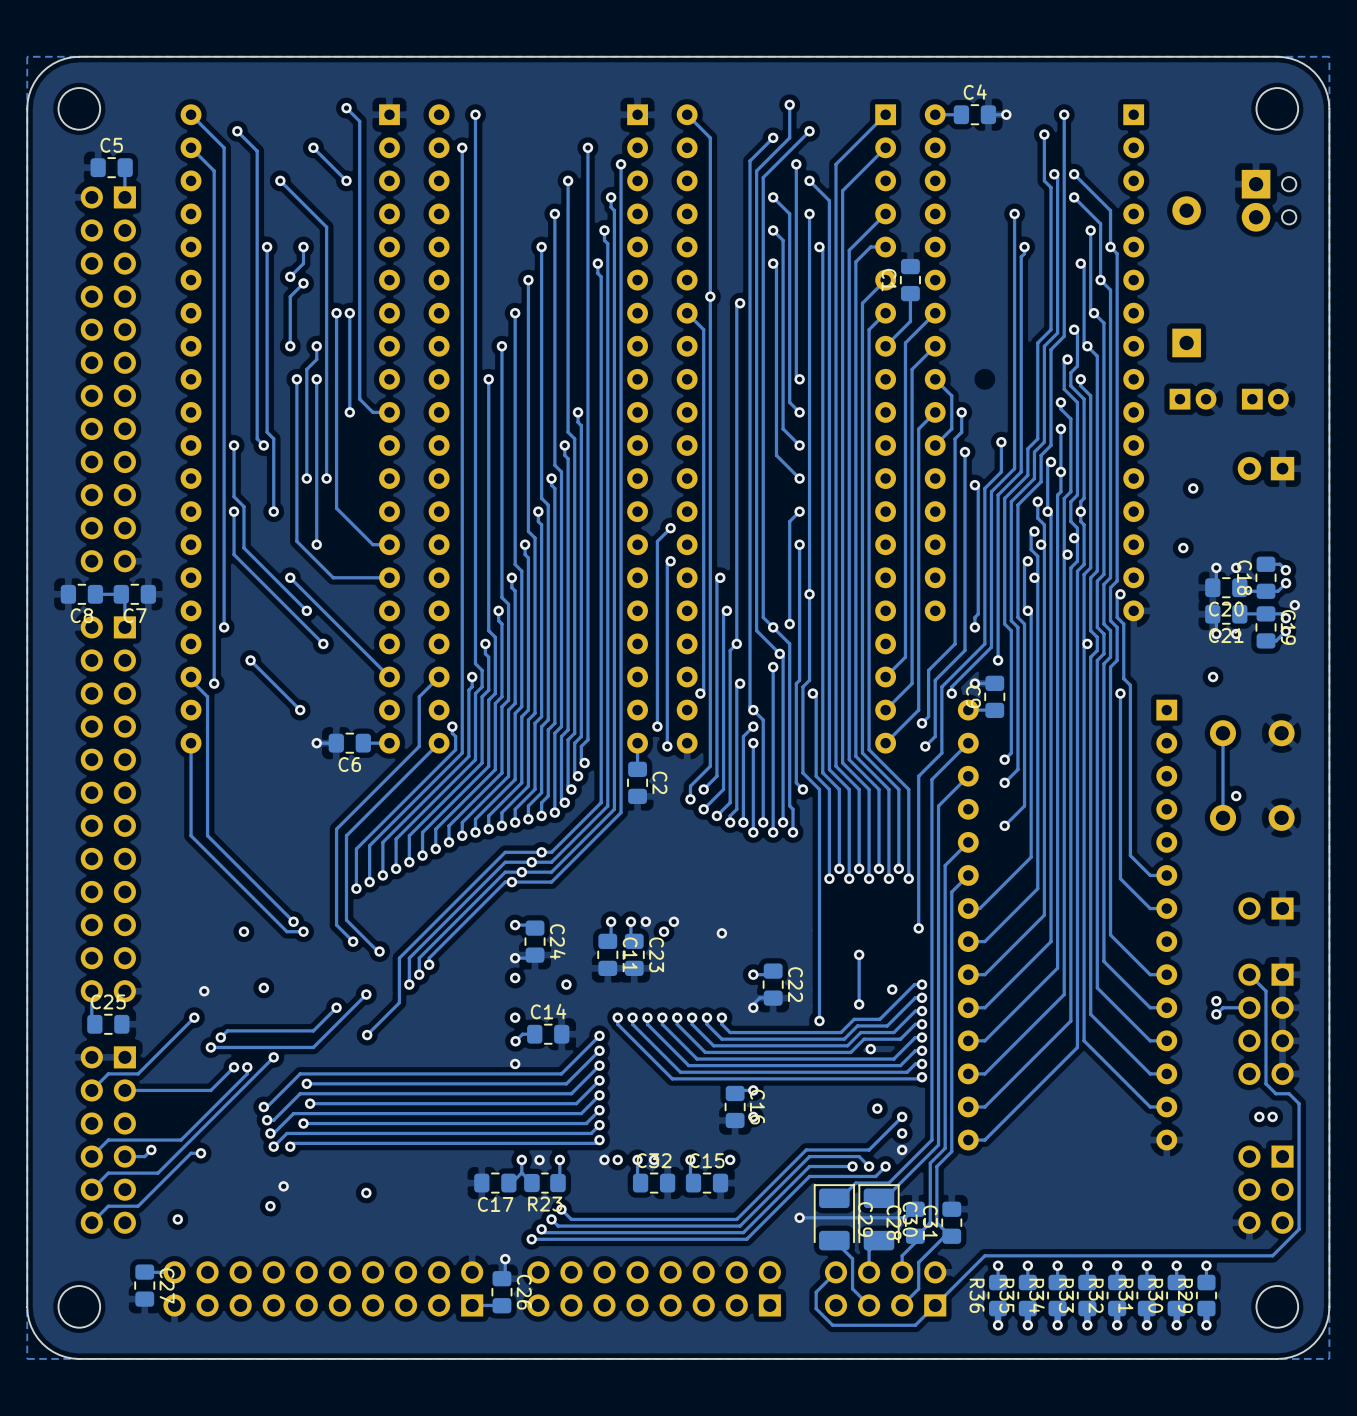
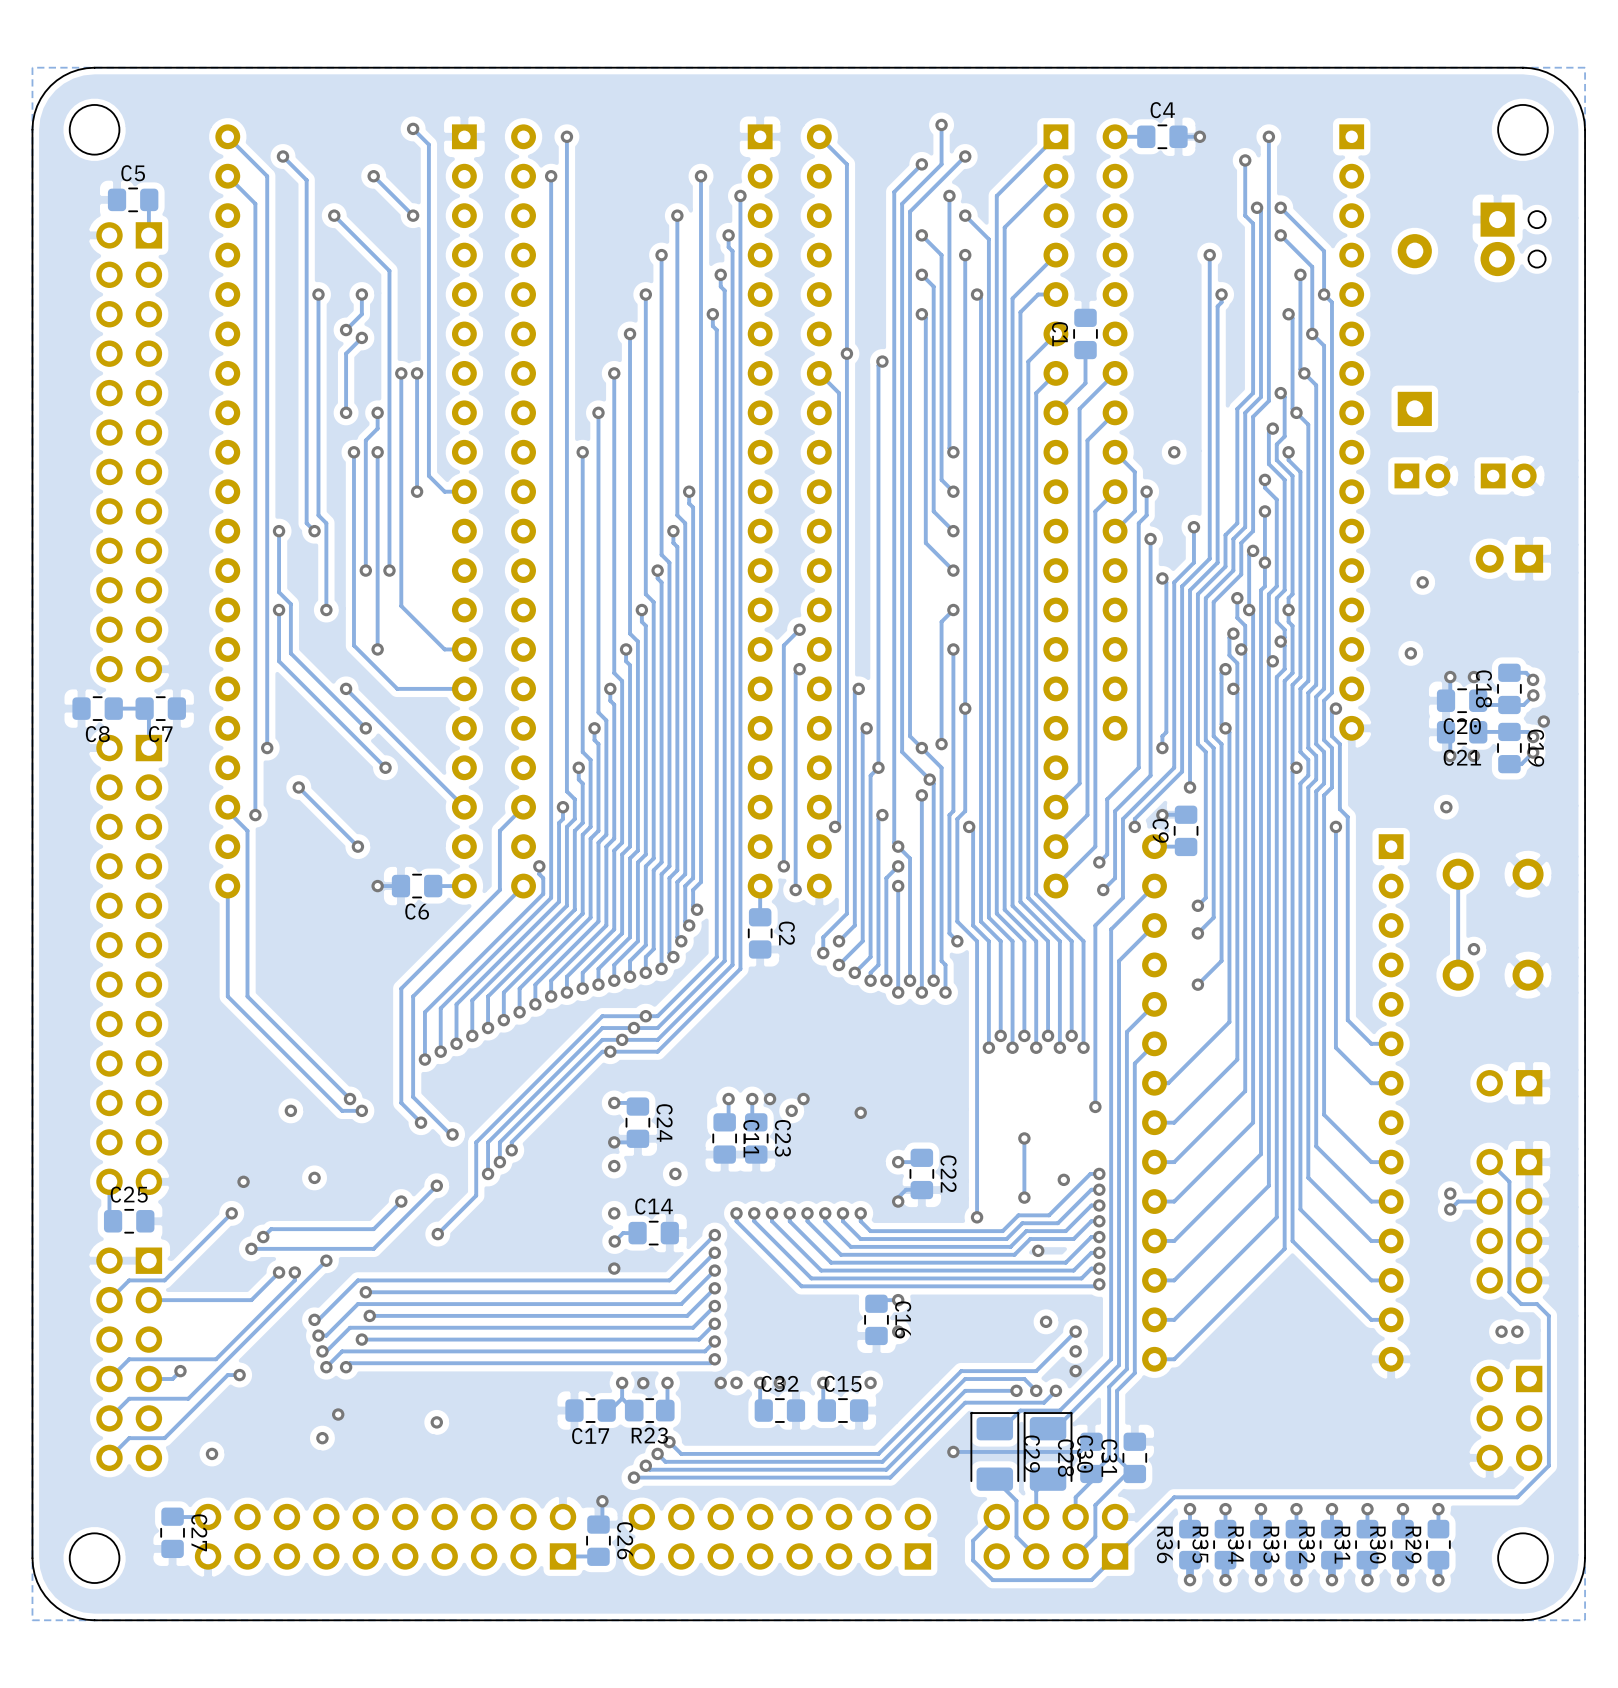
via: none -> (1174, 452)

